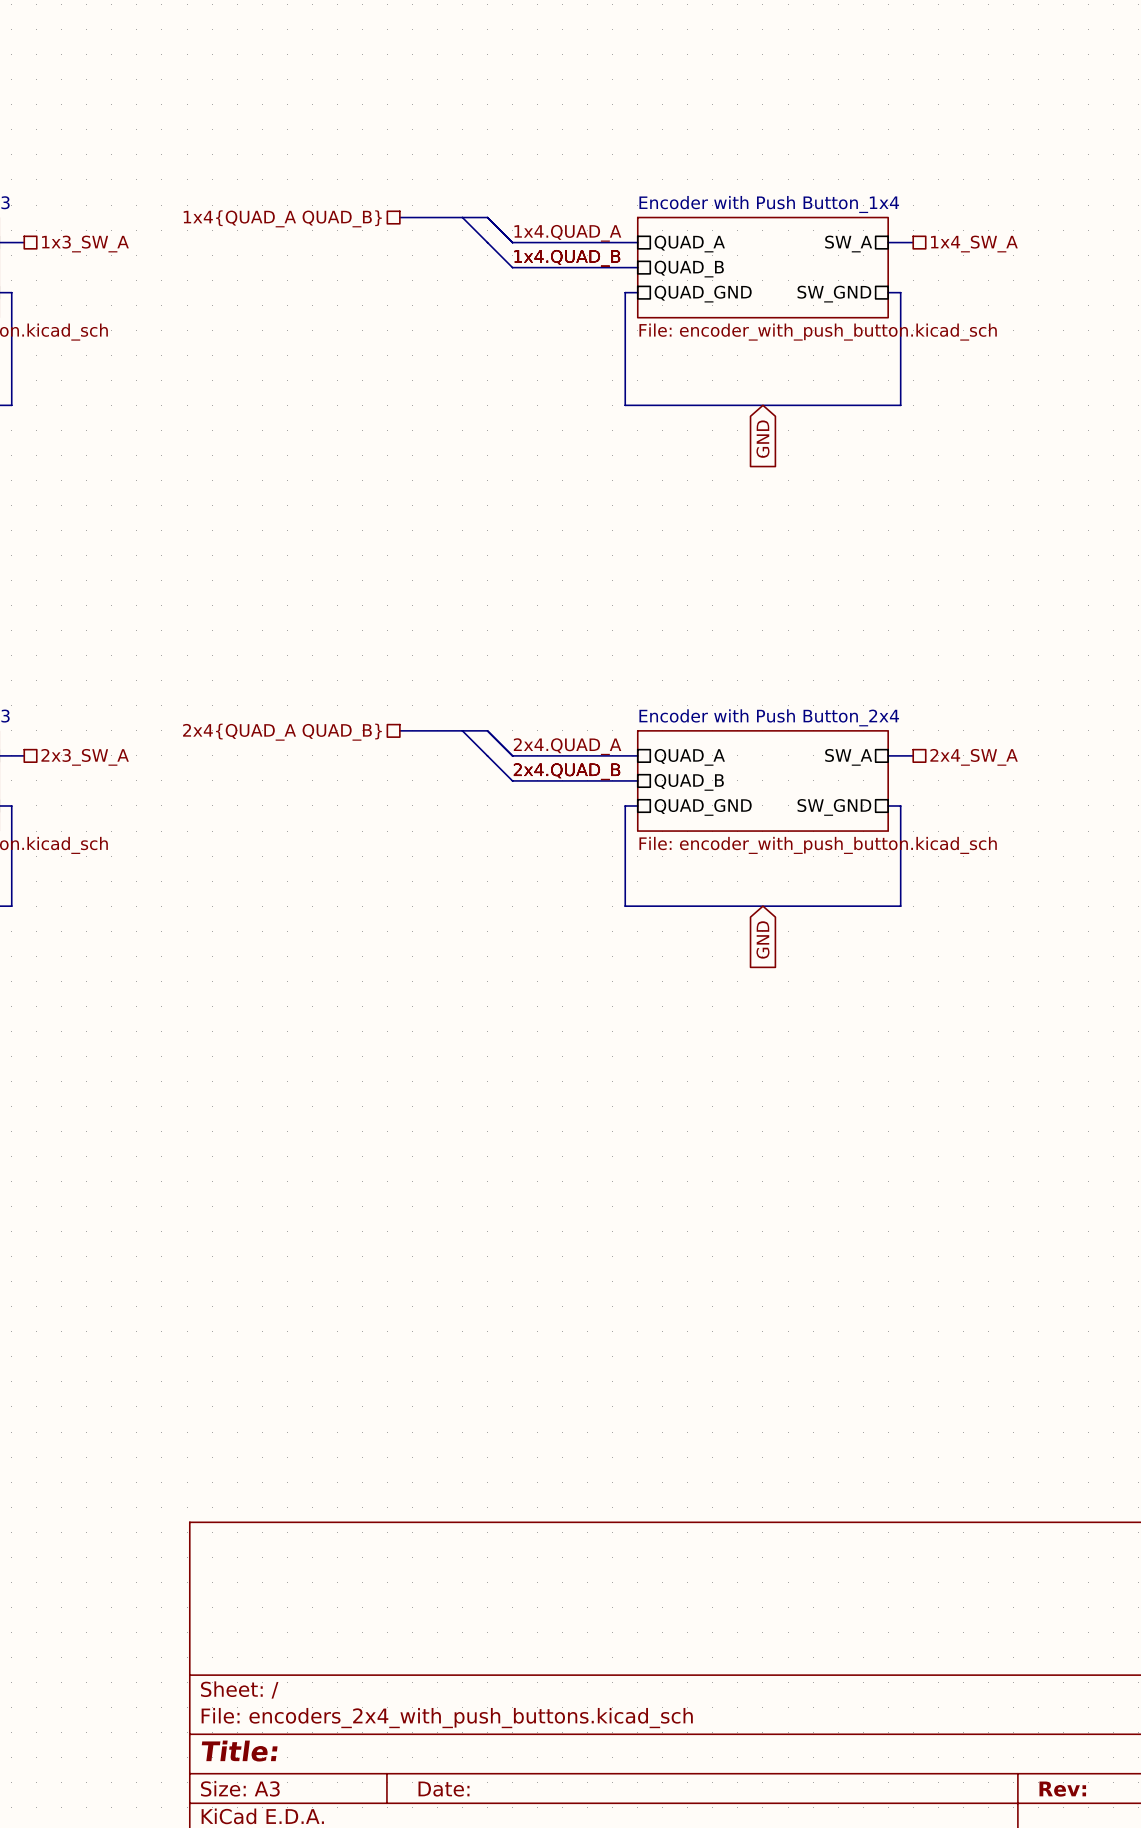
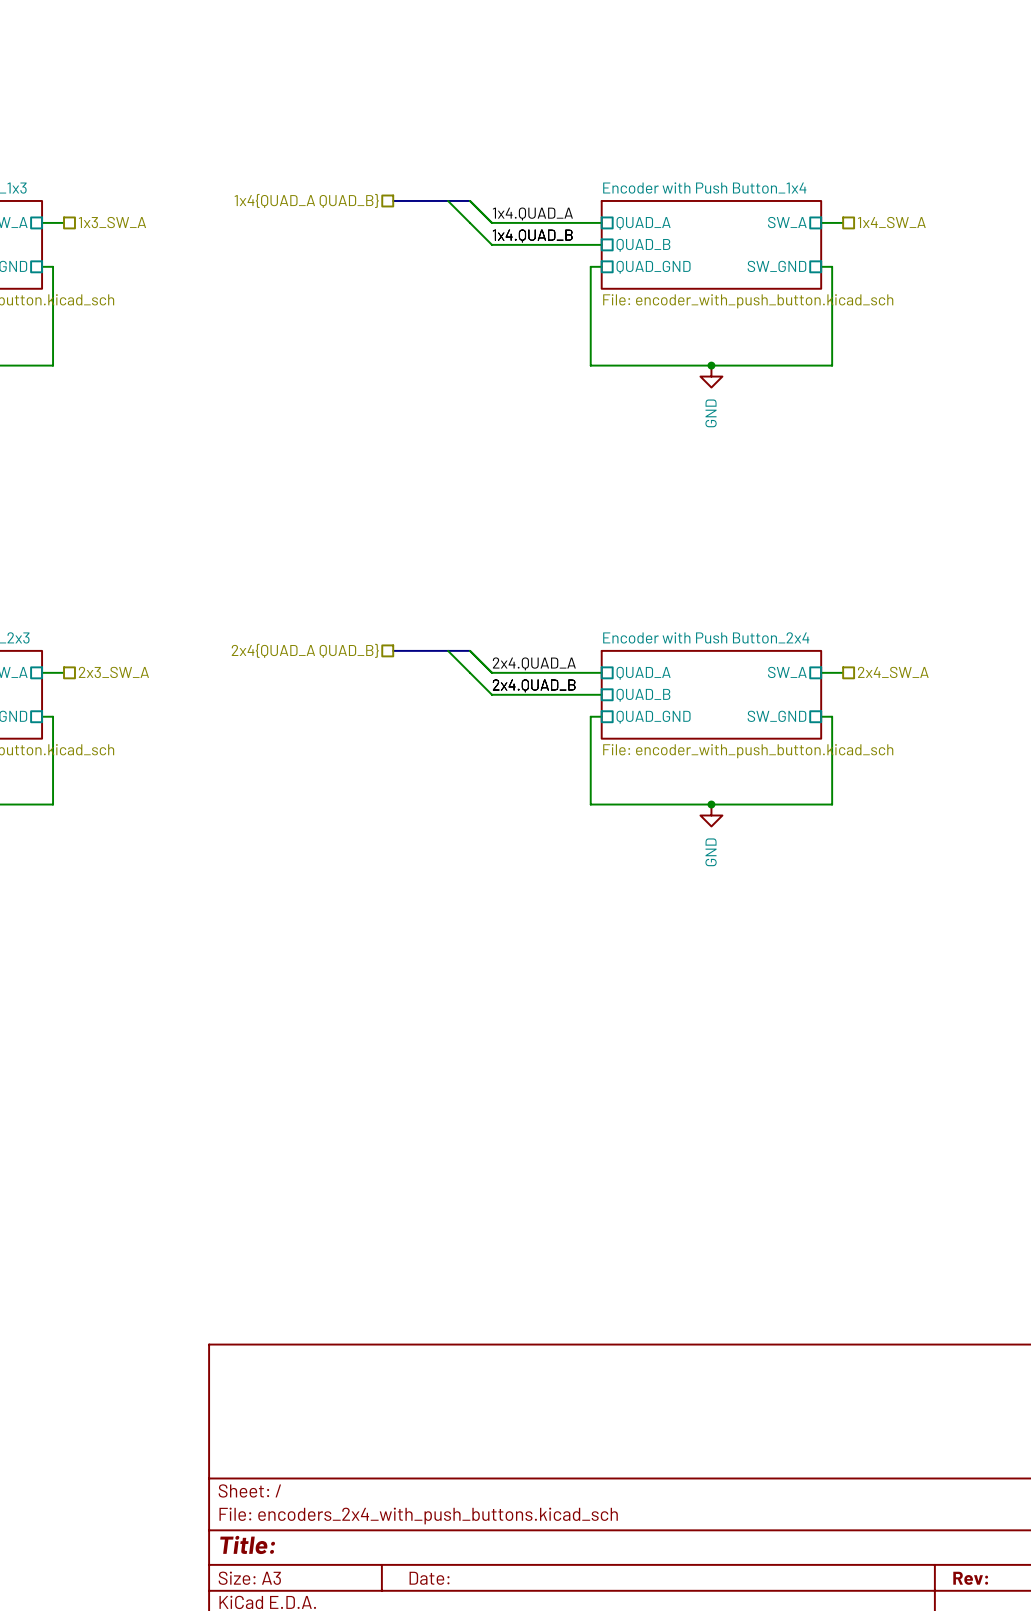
junction: none -> (711, 365)
power symbol: none -> GND (711, 376)
global label: GND (762, 439) -> none
junction: none -> (711, 804)
power symbol: none -> GND (711, 815)
global label: GND (762, 939) -> none

